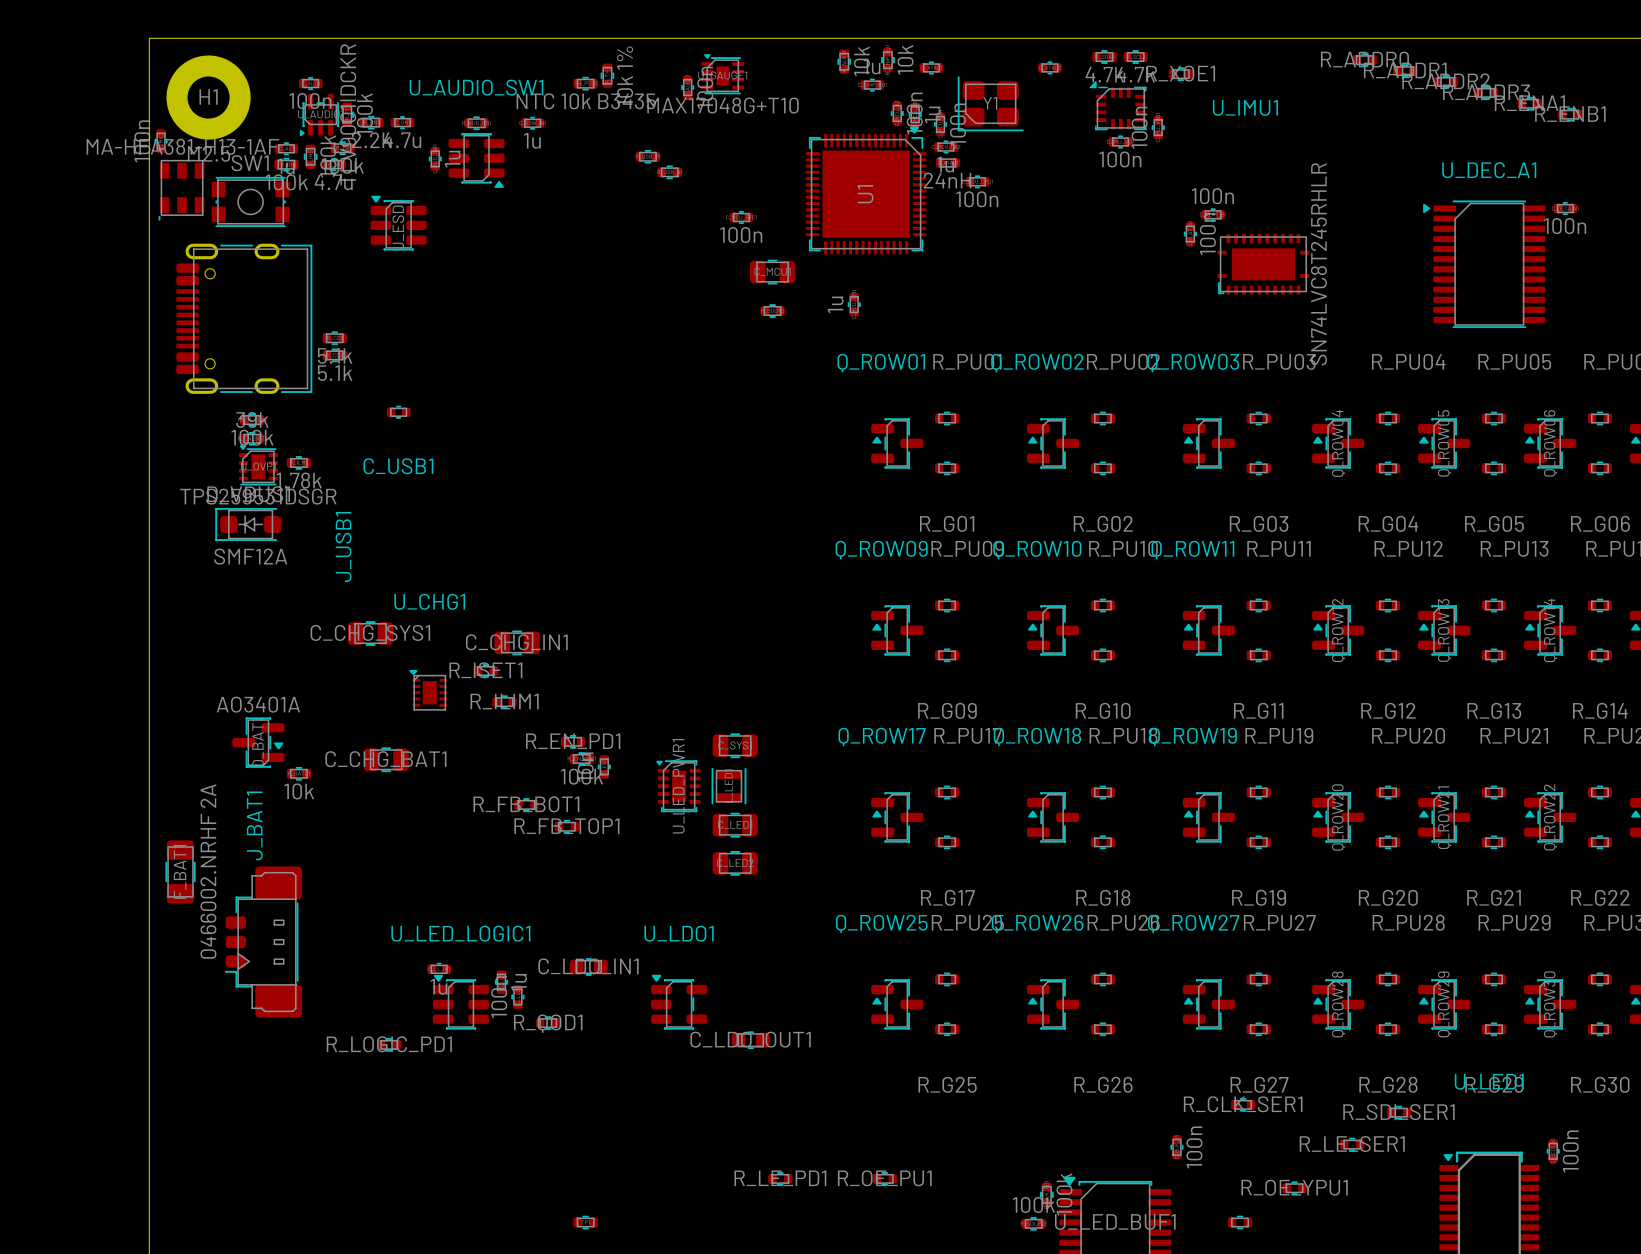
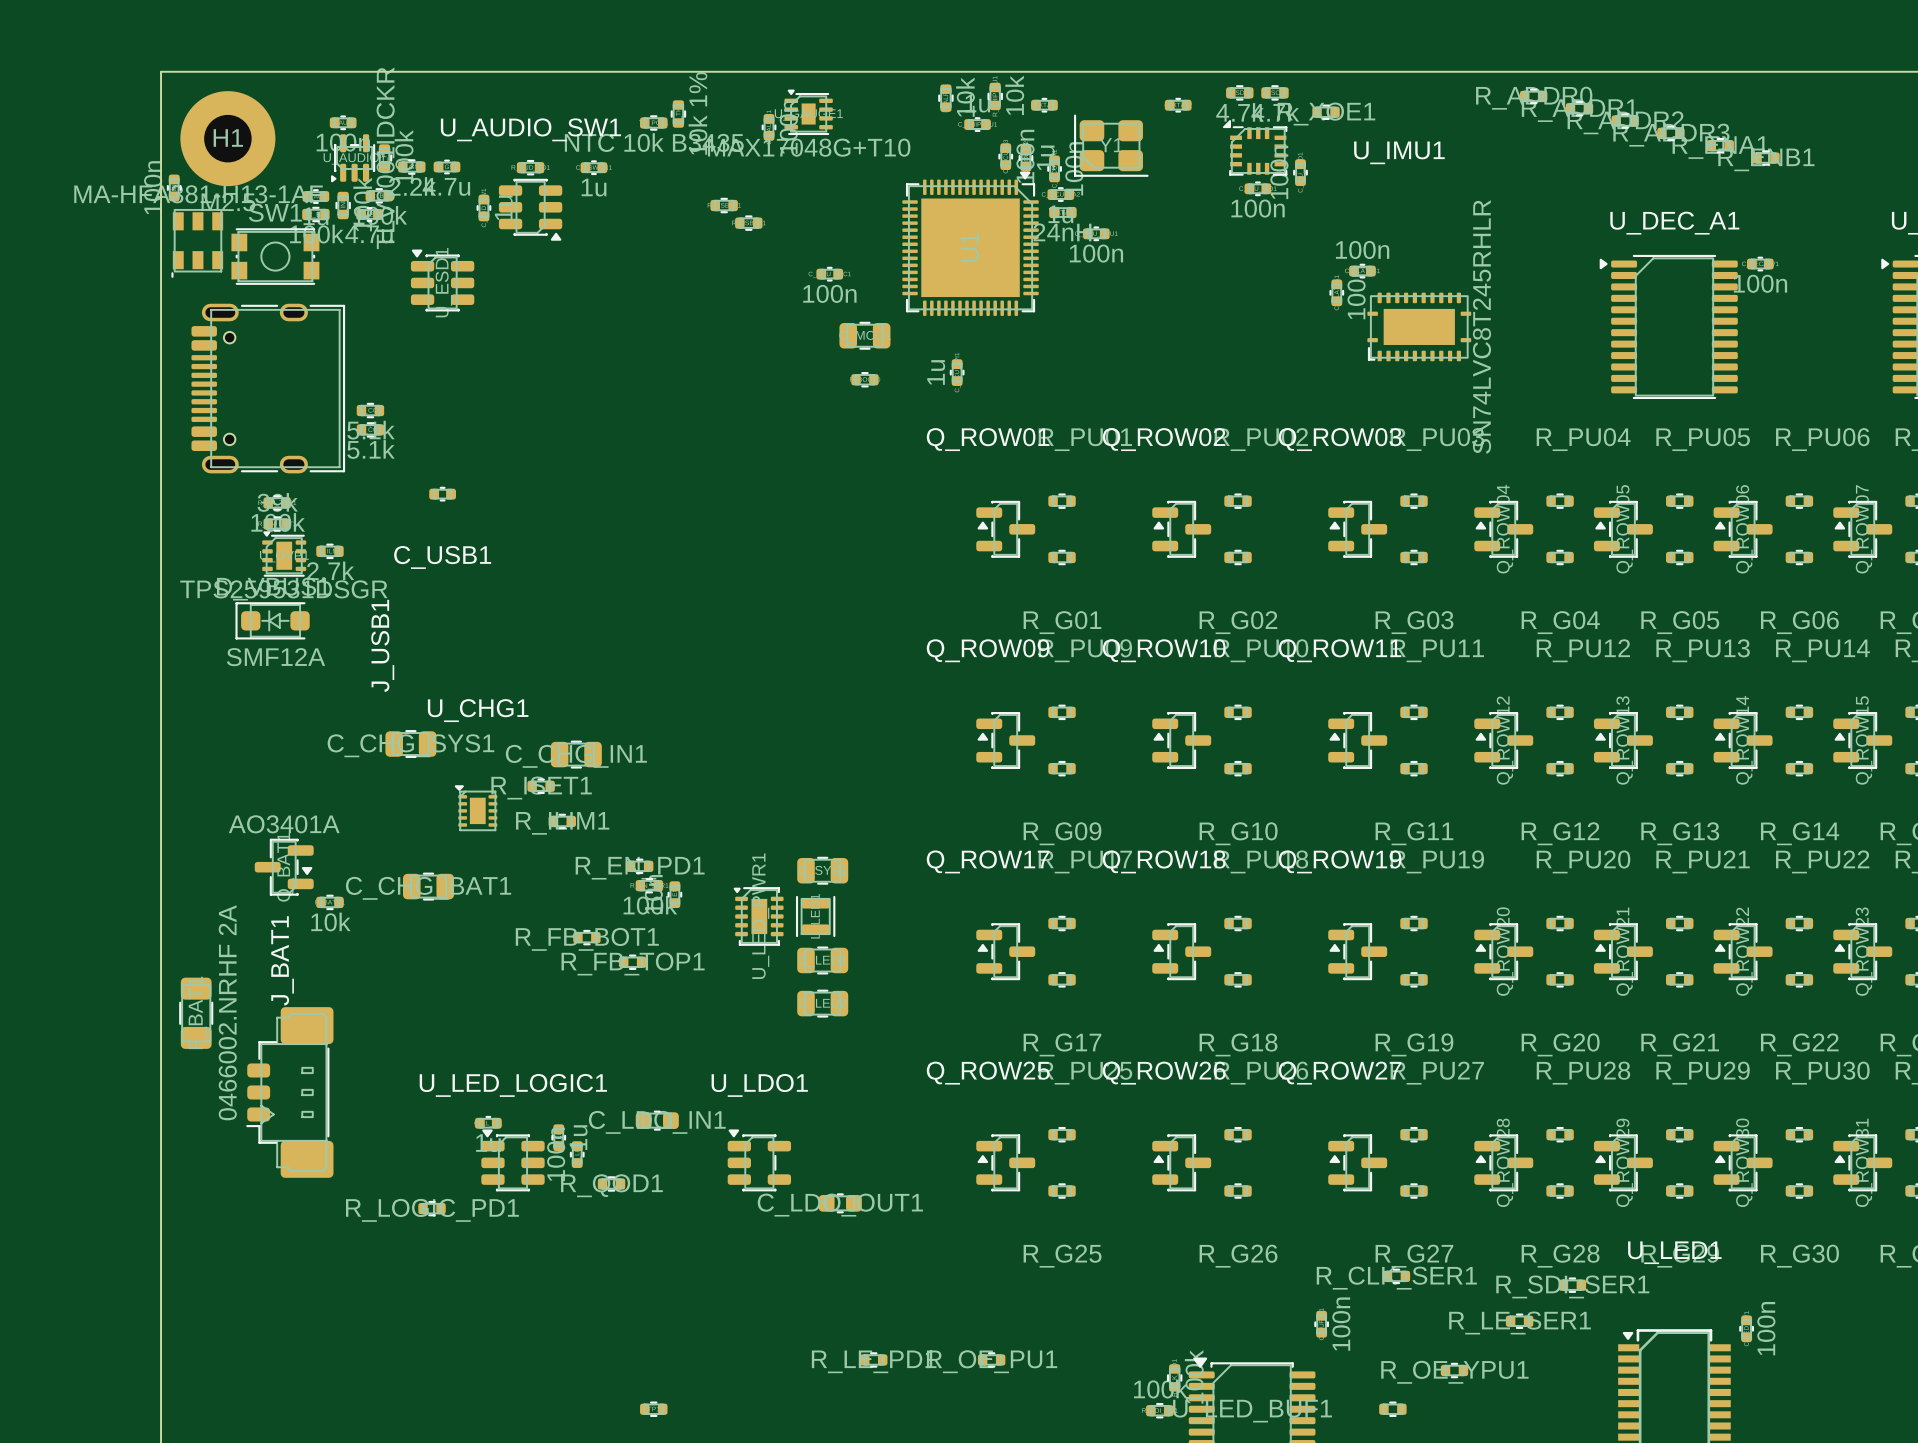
part value: 1.78k (299, 480) -> 2.7k (330, 570)

